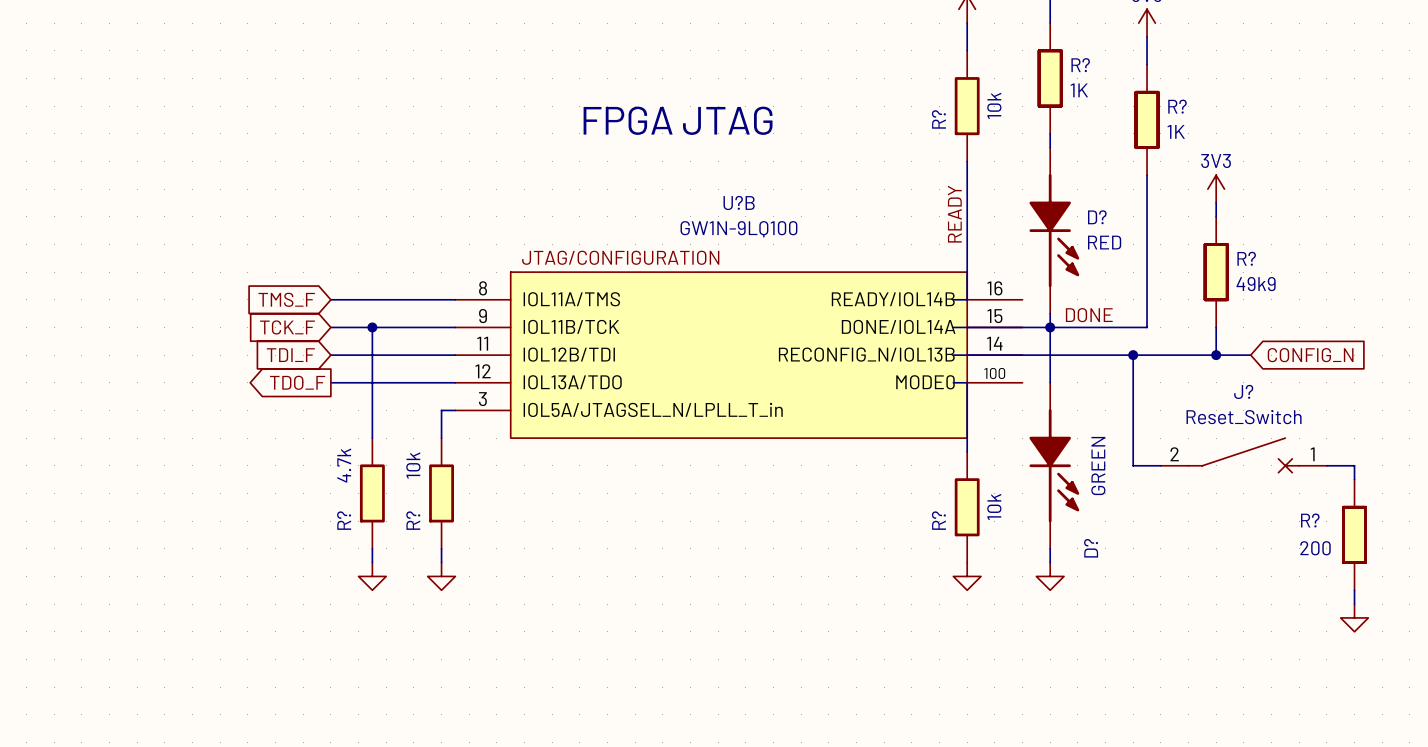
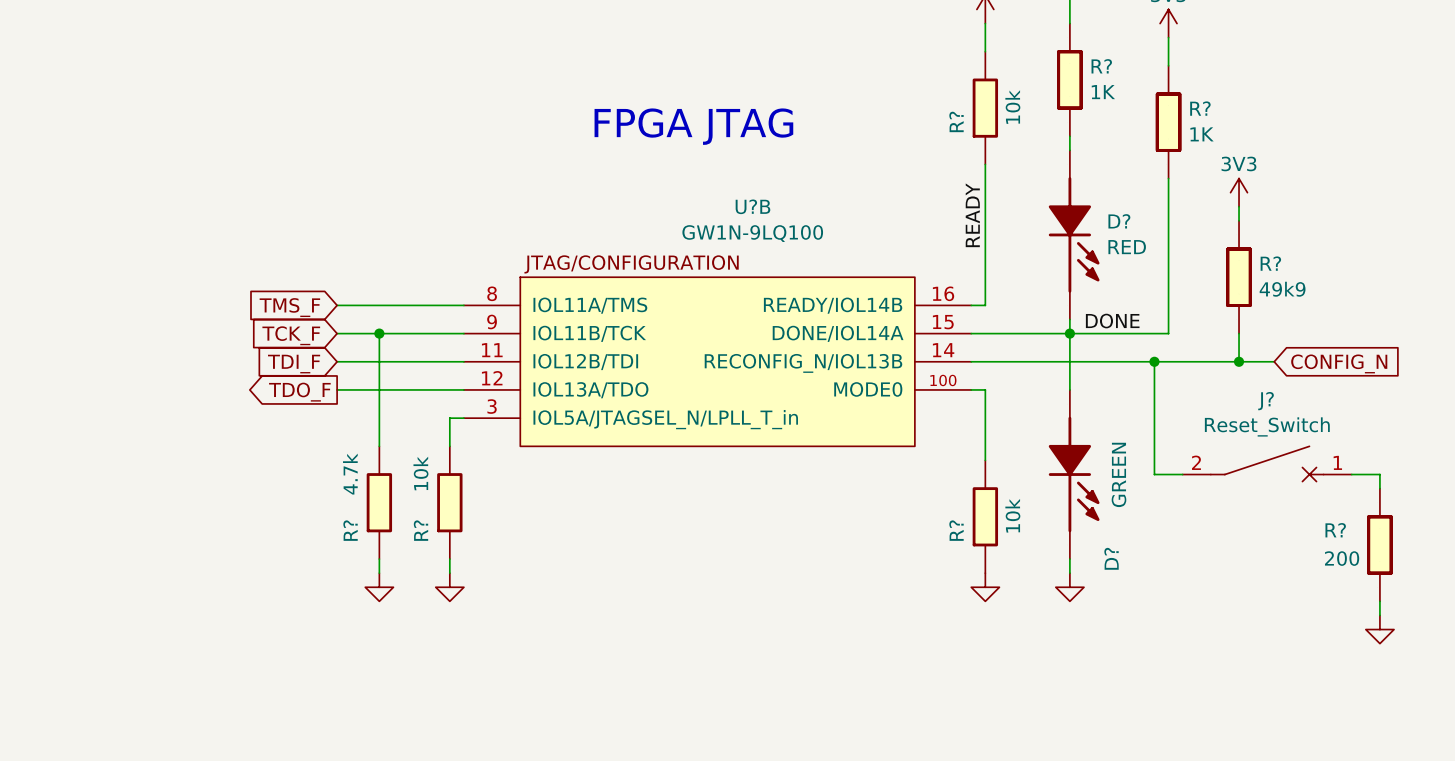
U?B: none -> GW1N-9LQ100 (717, 361)
U?B: GW1N-9LQ100 (738, 355) -> none

